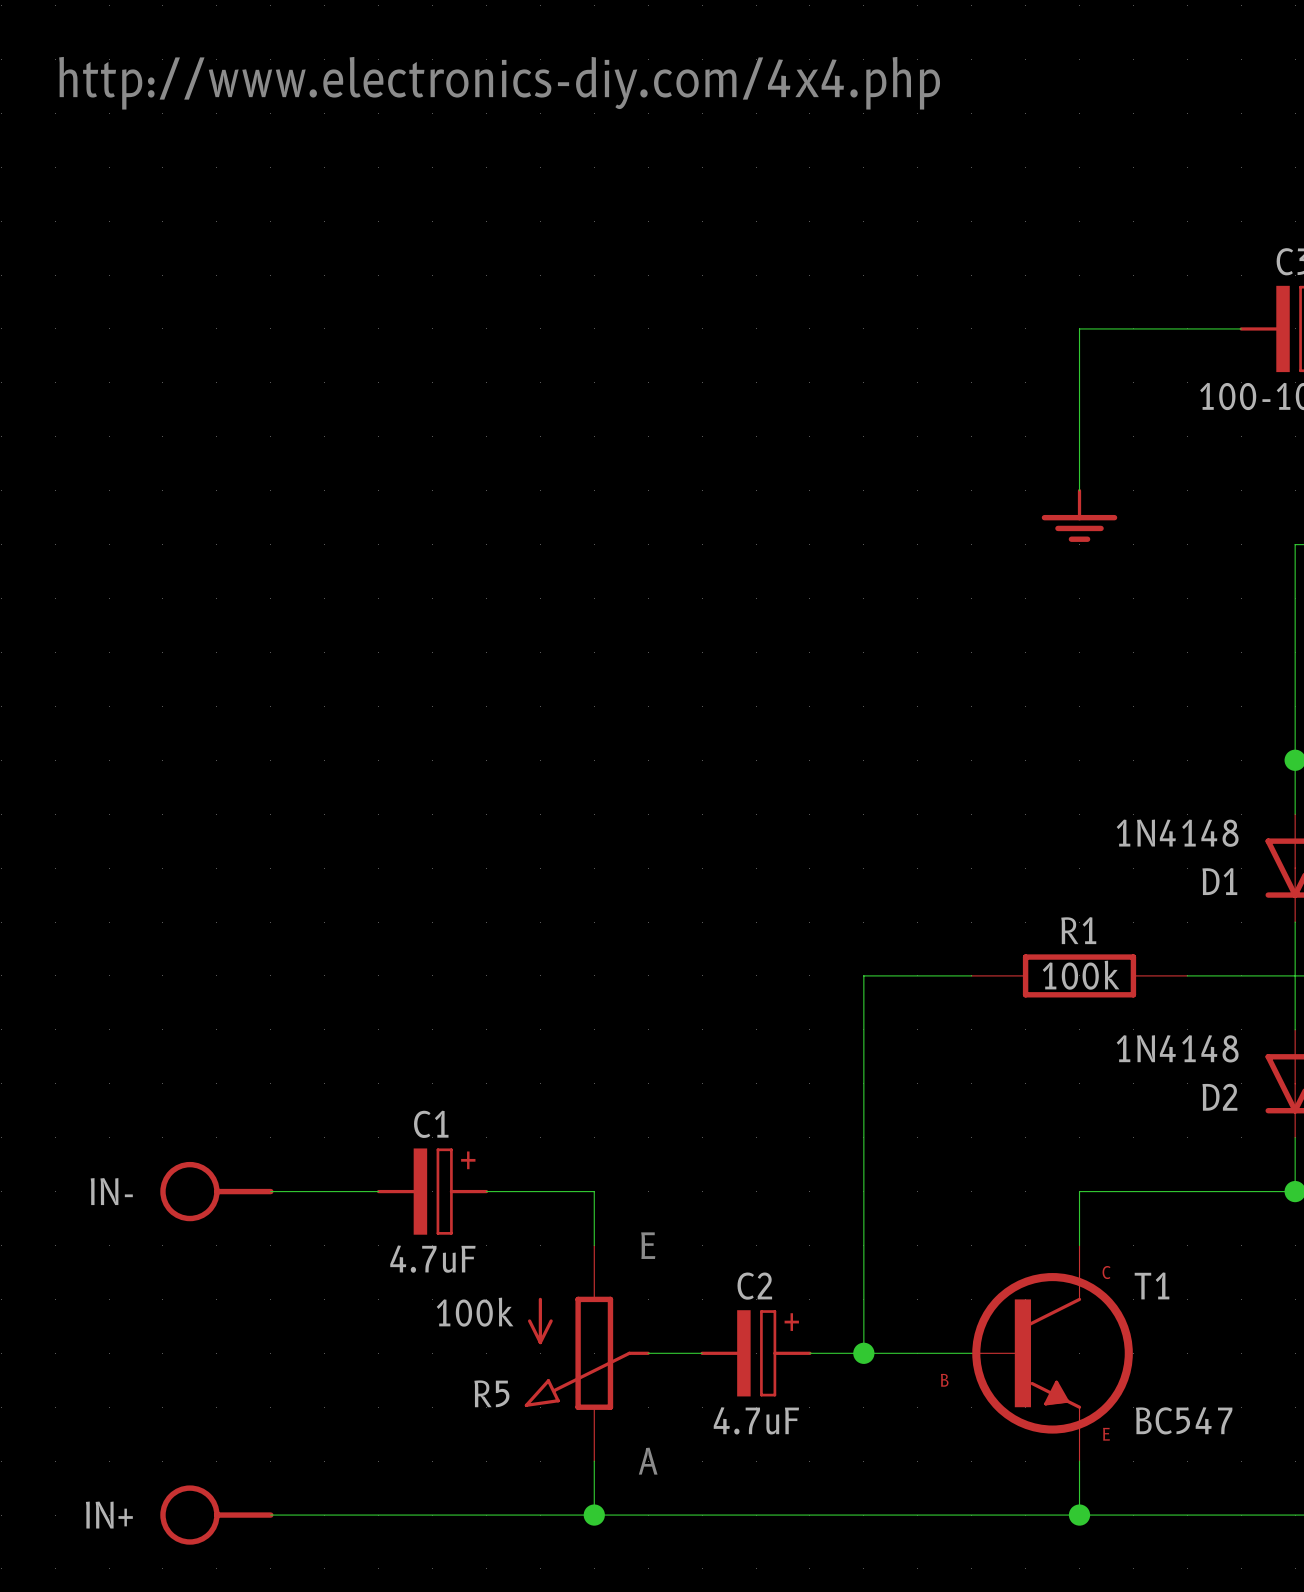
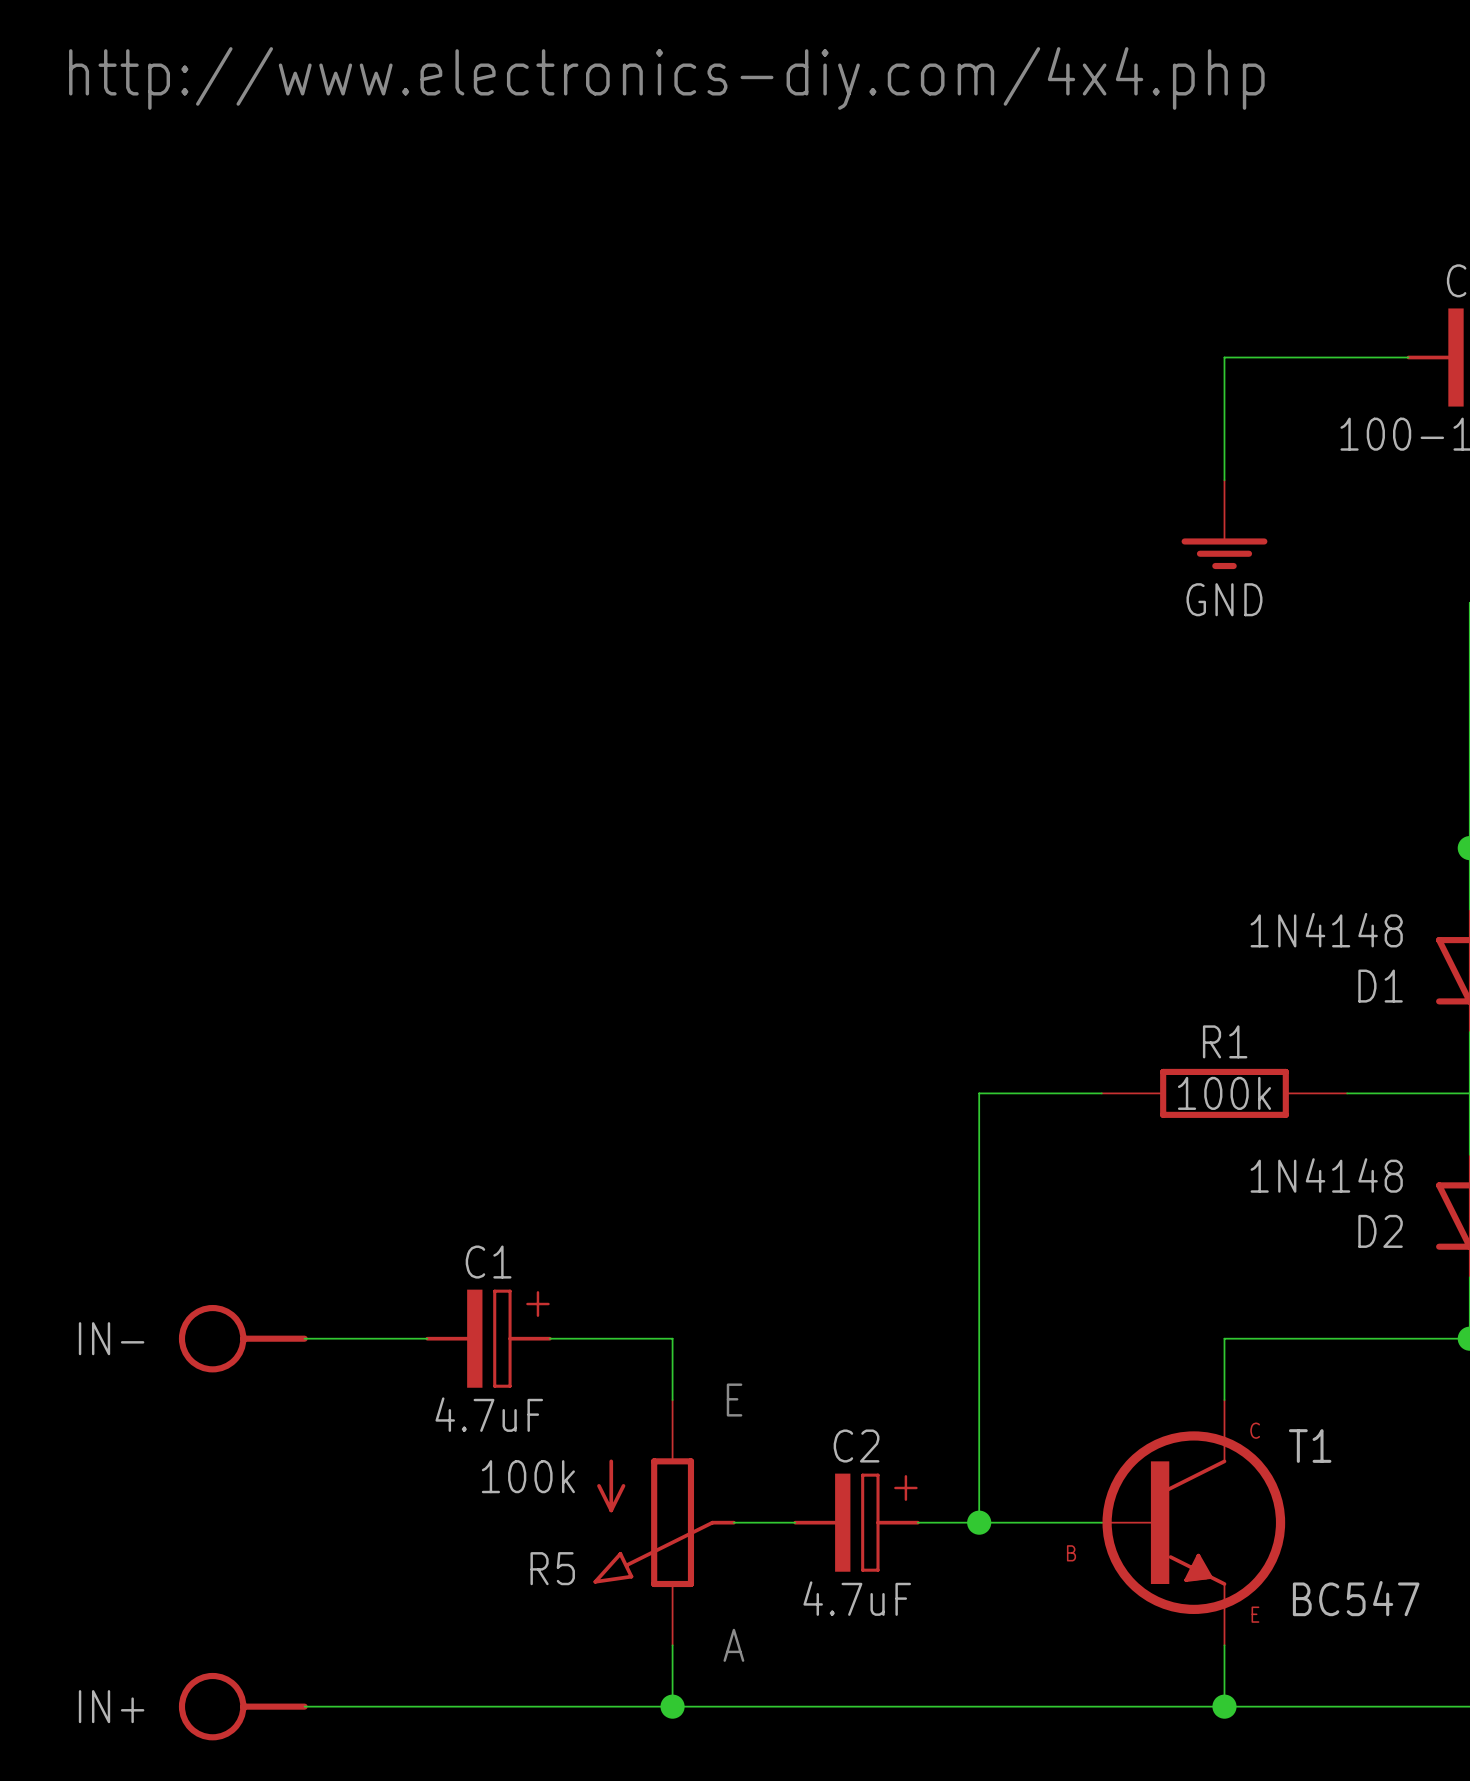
power symbol: none -> GND (1224, 524)
power symbol: (1079, 515) -> none

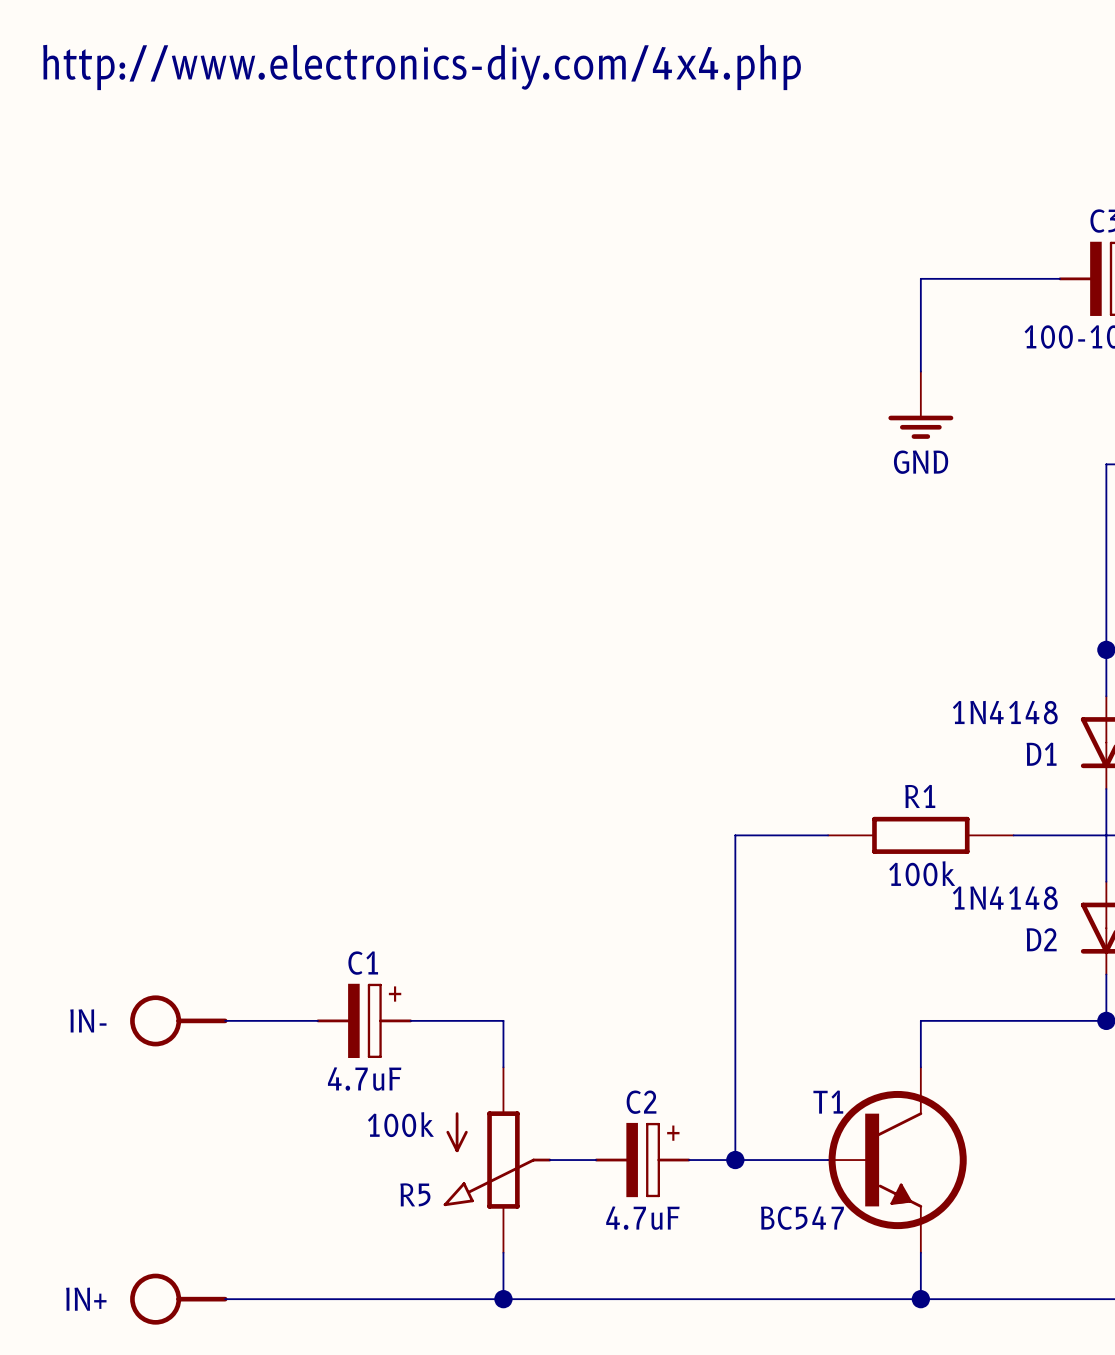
R1 value position: 100k (1224, 1093) -> 100k (922, 873)
R5 text: E (734, 1400) -> none
T1 text: C (1255, 1430) -> none
T1 name position: T1 (1310, 1446) -> T1 (828, 1102)
T1 text: B (1071, 1553) -> none
T1 value position: BC547 (1356, 1598) -> BC547 (802, 1218)
T1 text: E (1255, 1614) -> none
R5 text: A (733, 1645) -> none

